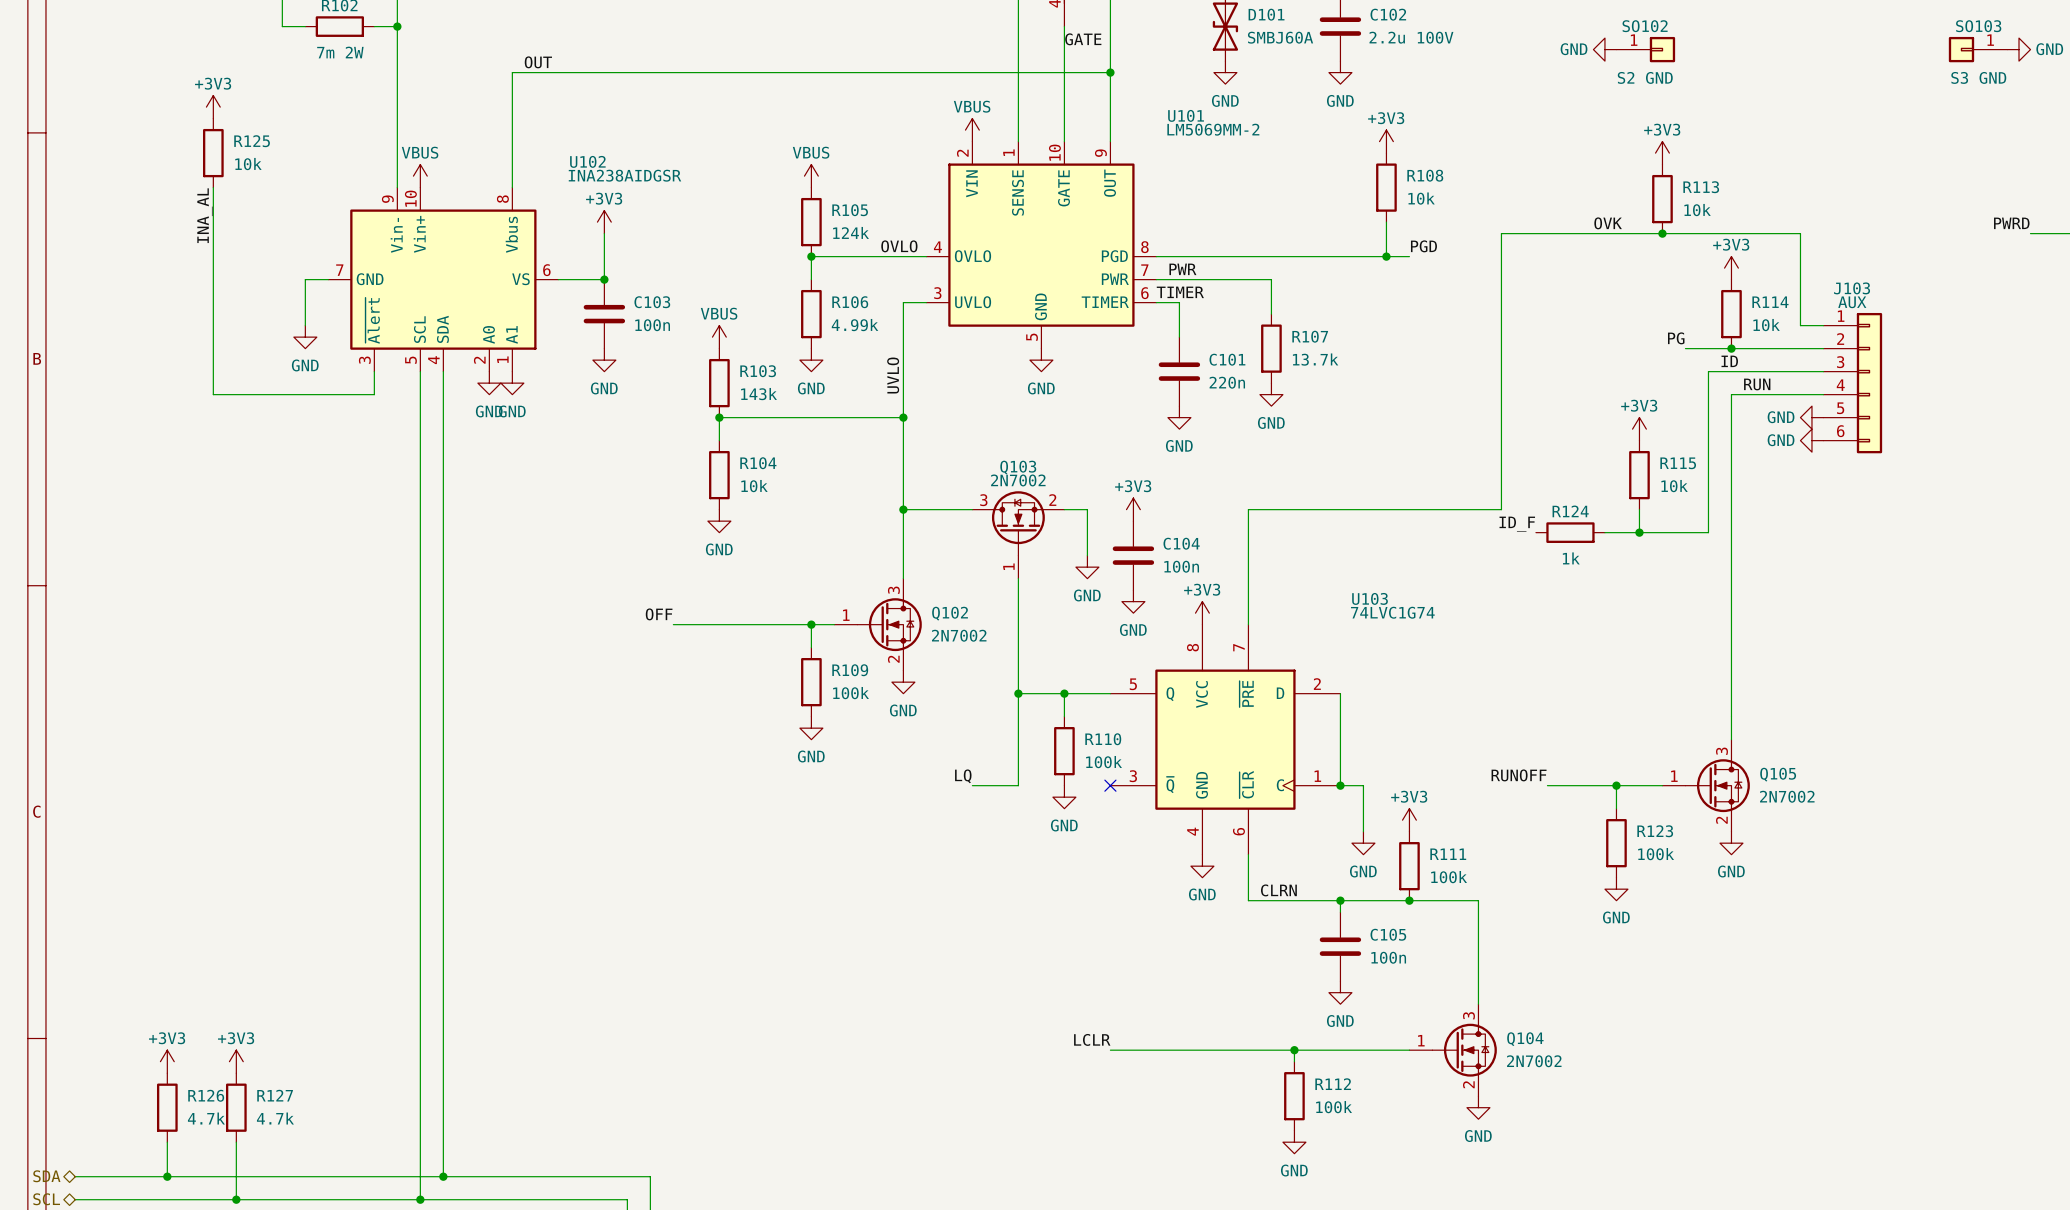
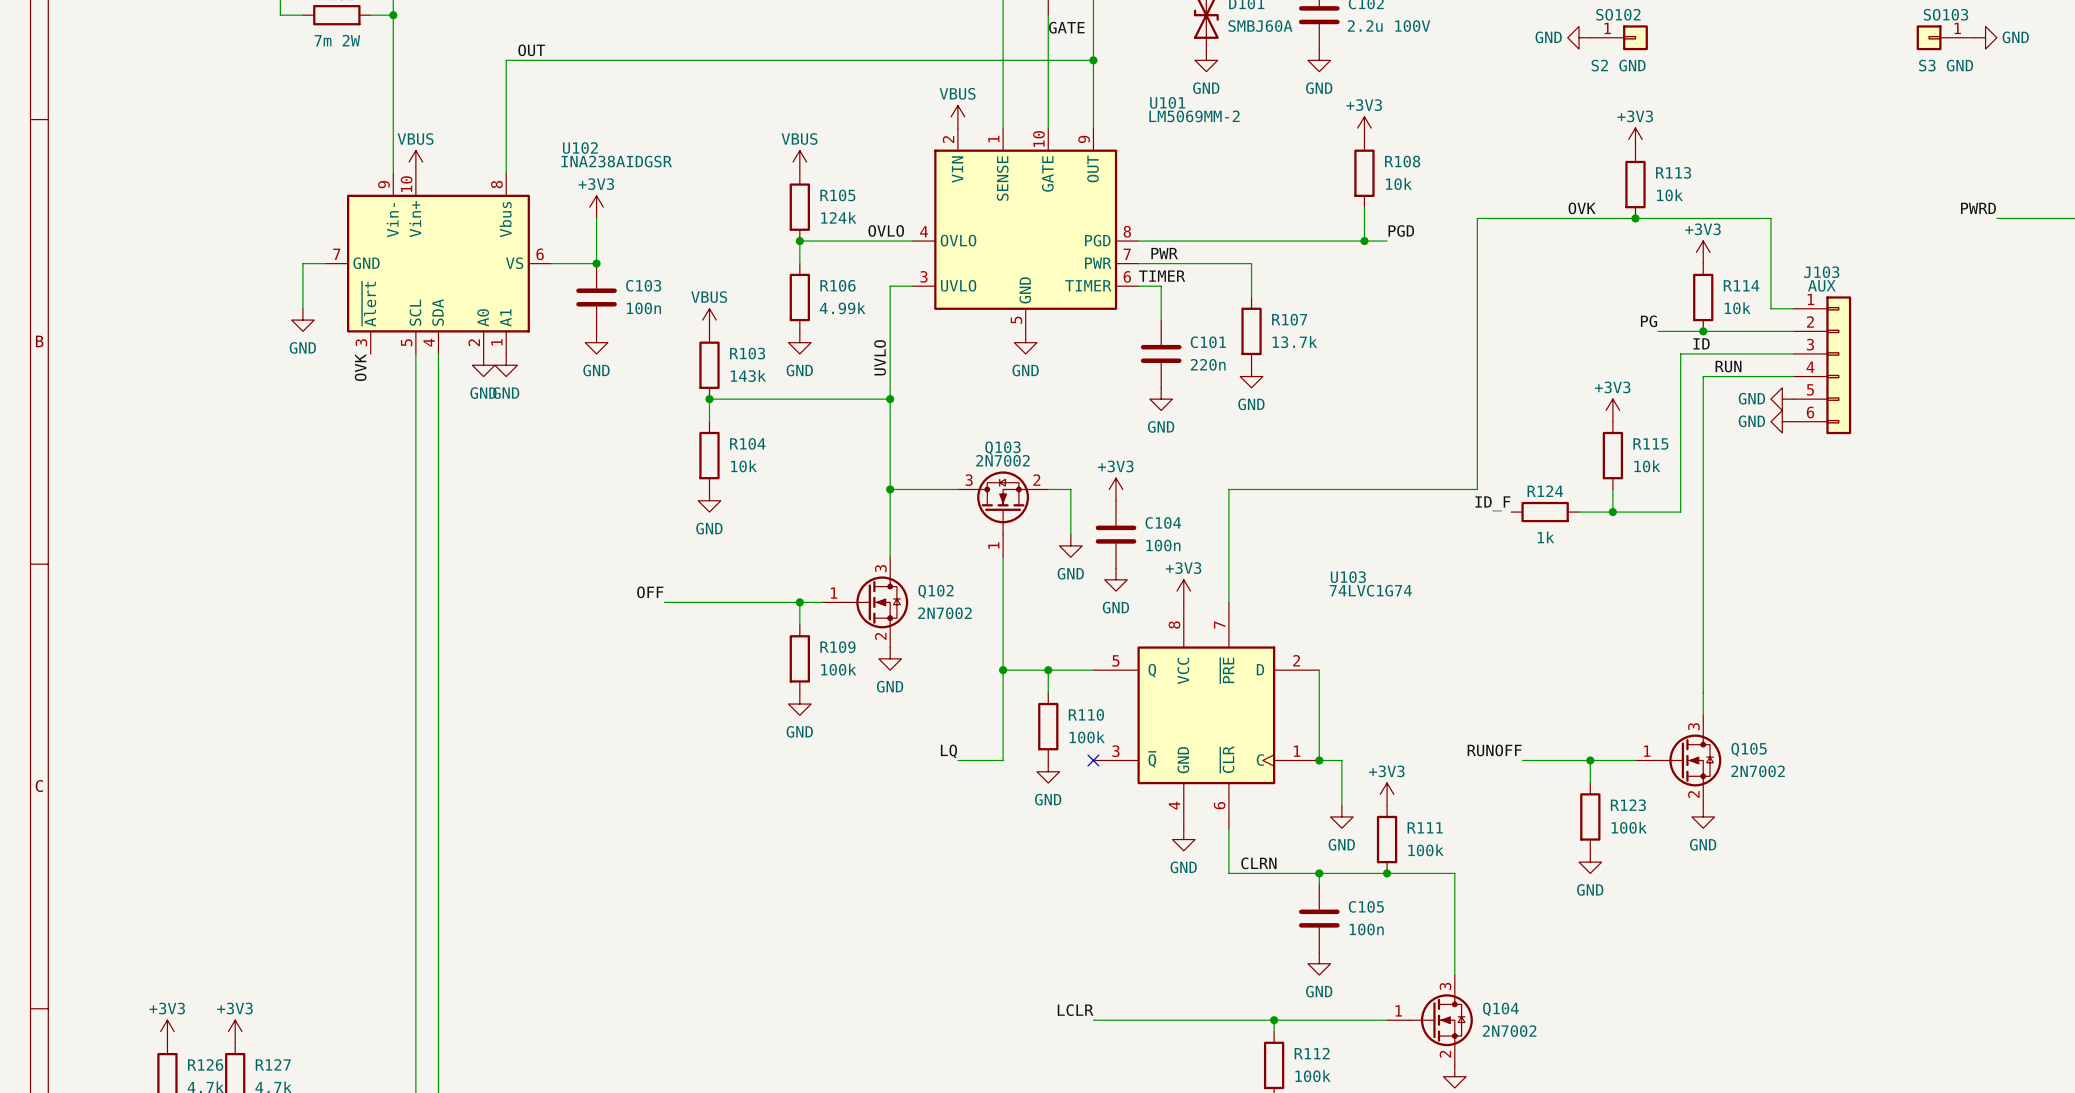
power symbol: +3V3 (213, 107) -> none
R125: 10k (213, 153) -> none
wire: (213, 187) (213, 394) (374, 394) (374, 371) -> none
label: INA_AL (204, 215) -> none
label: none -> OVK (360, 367)

